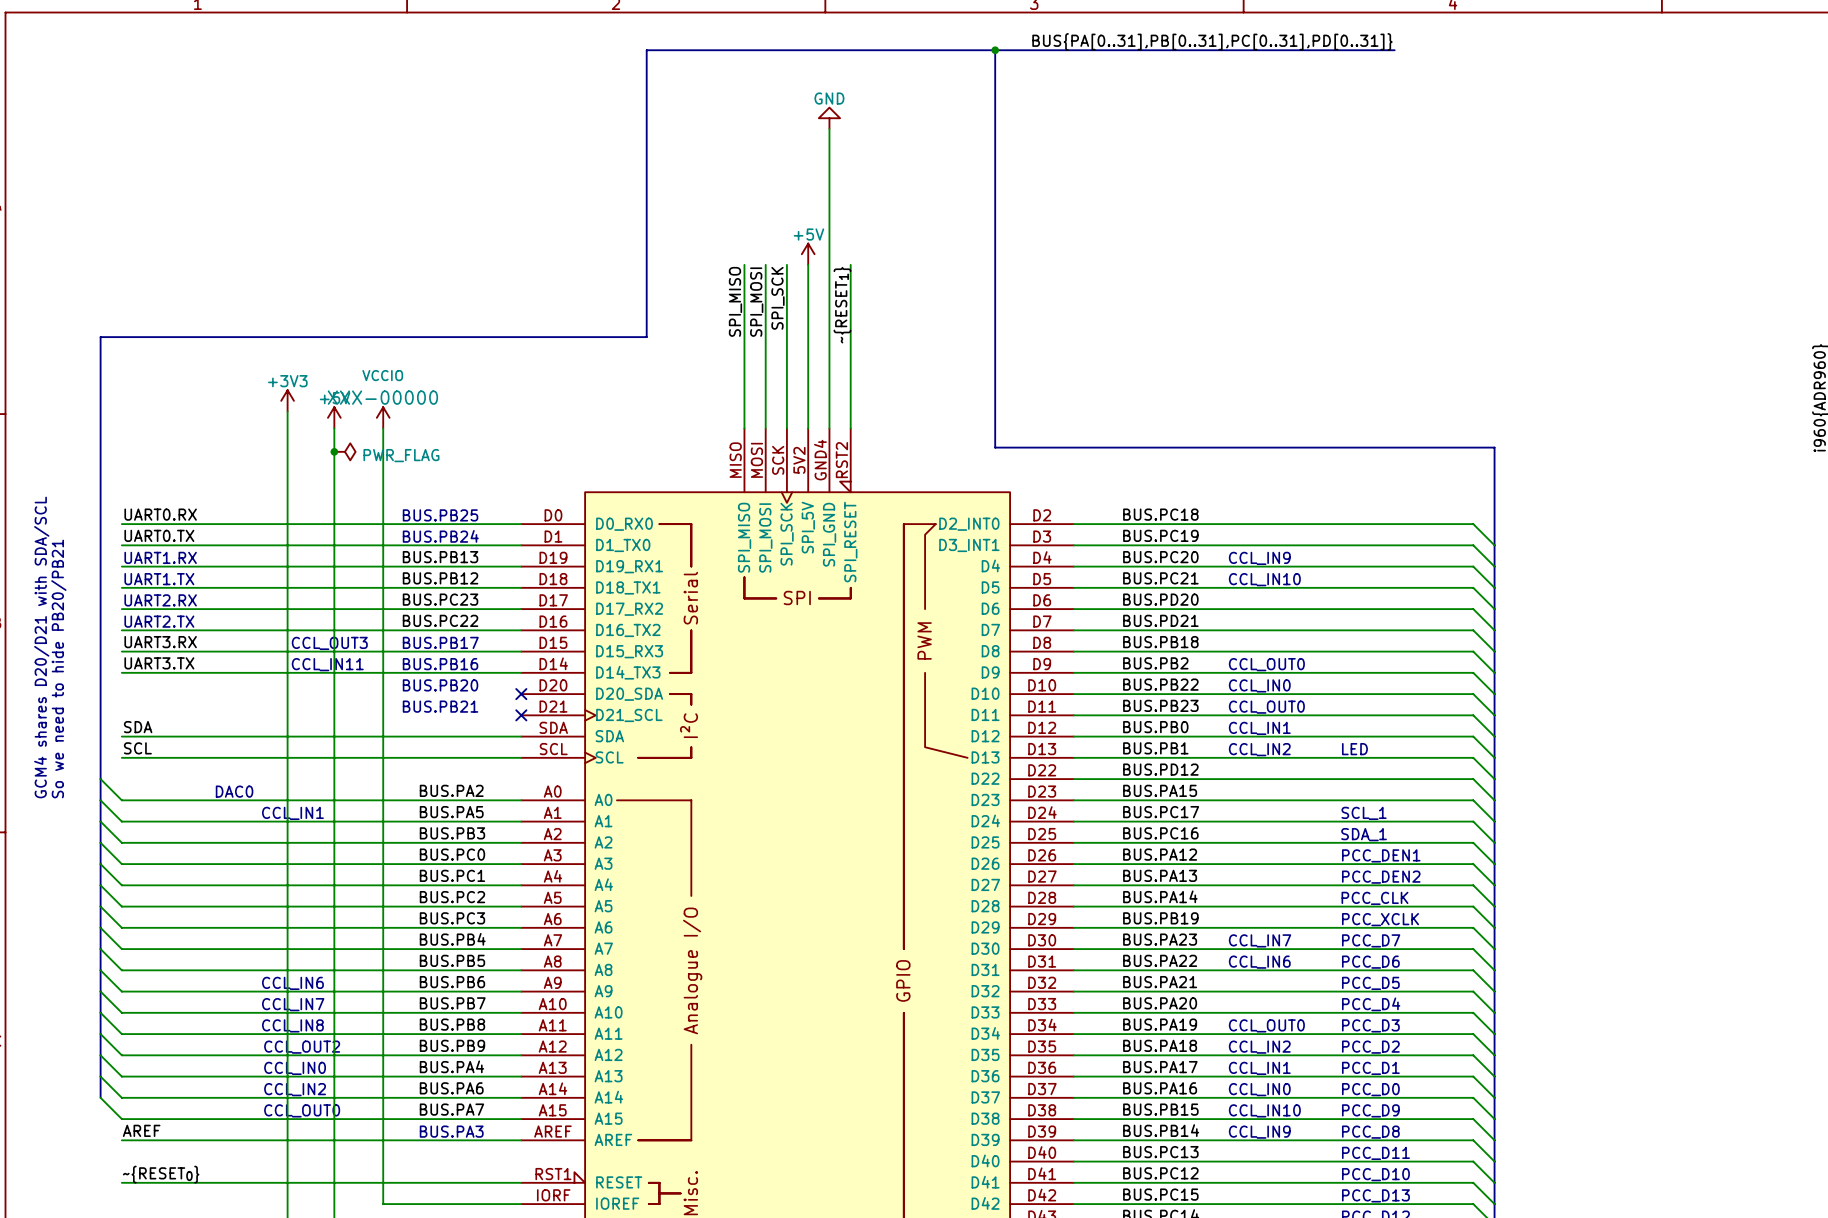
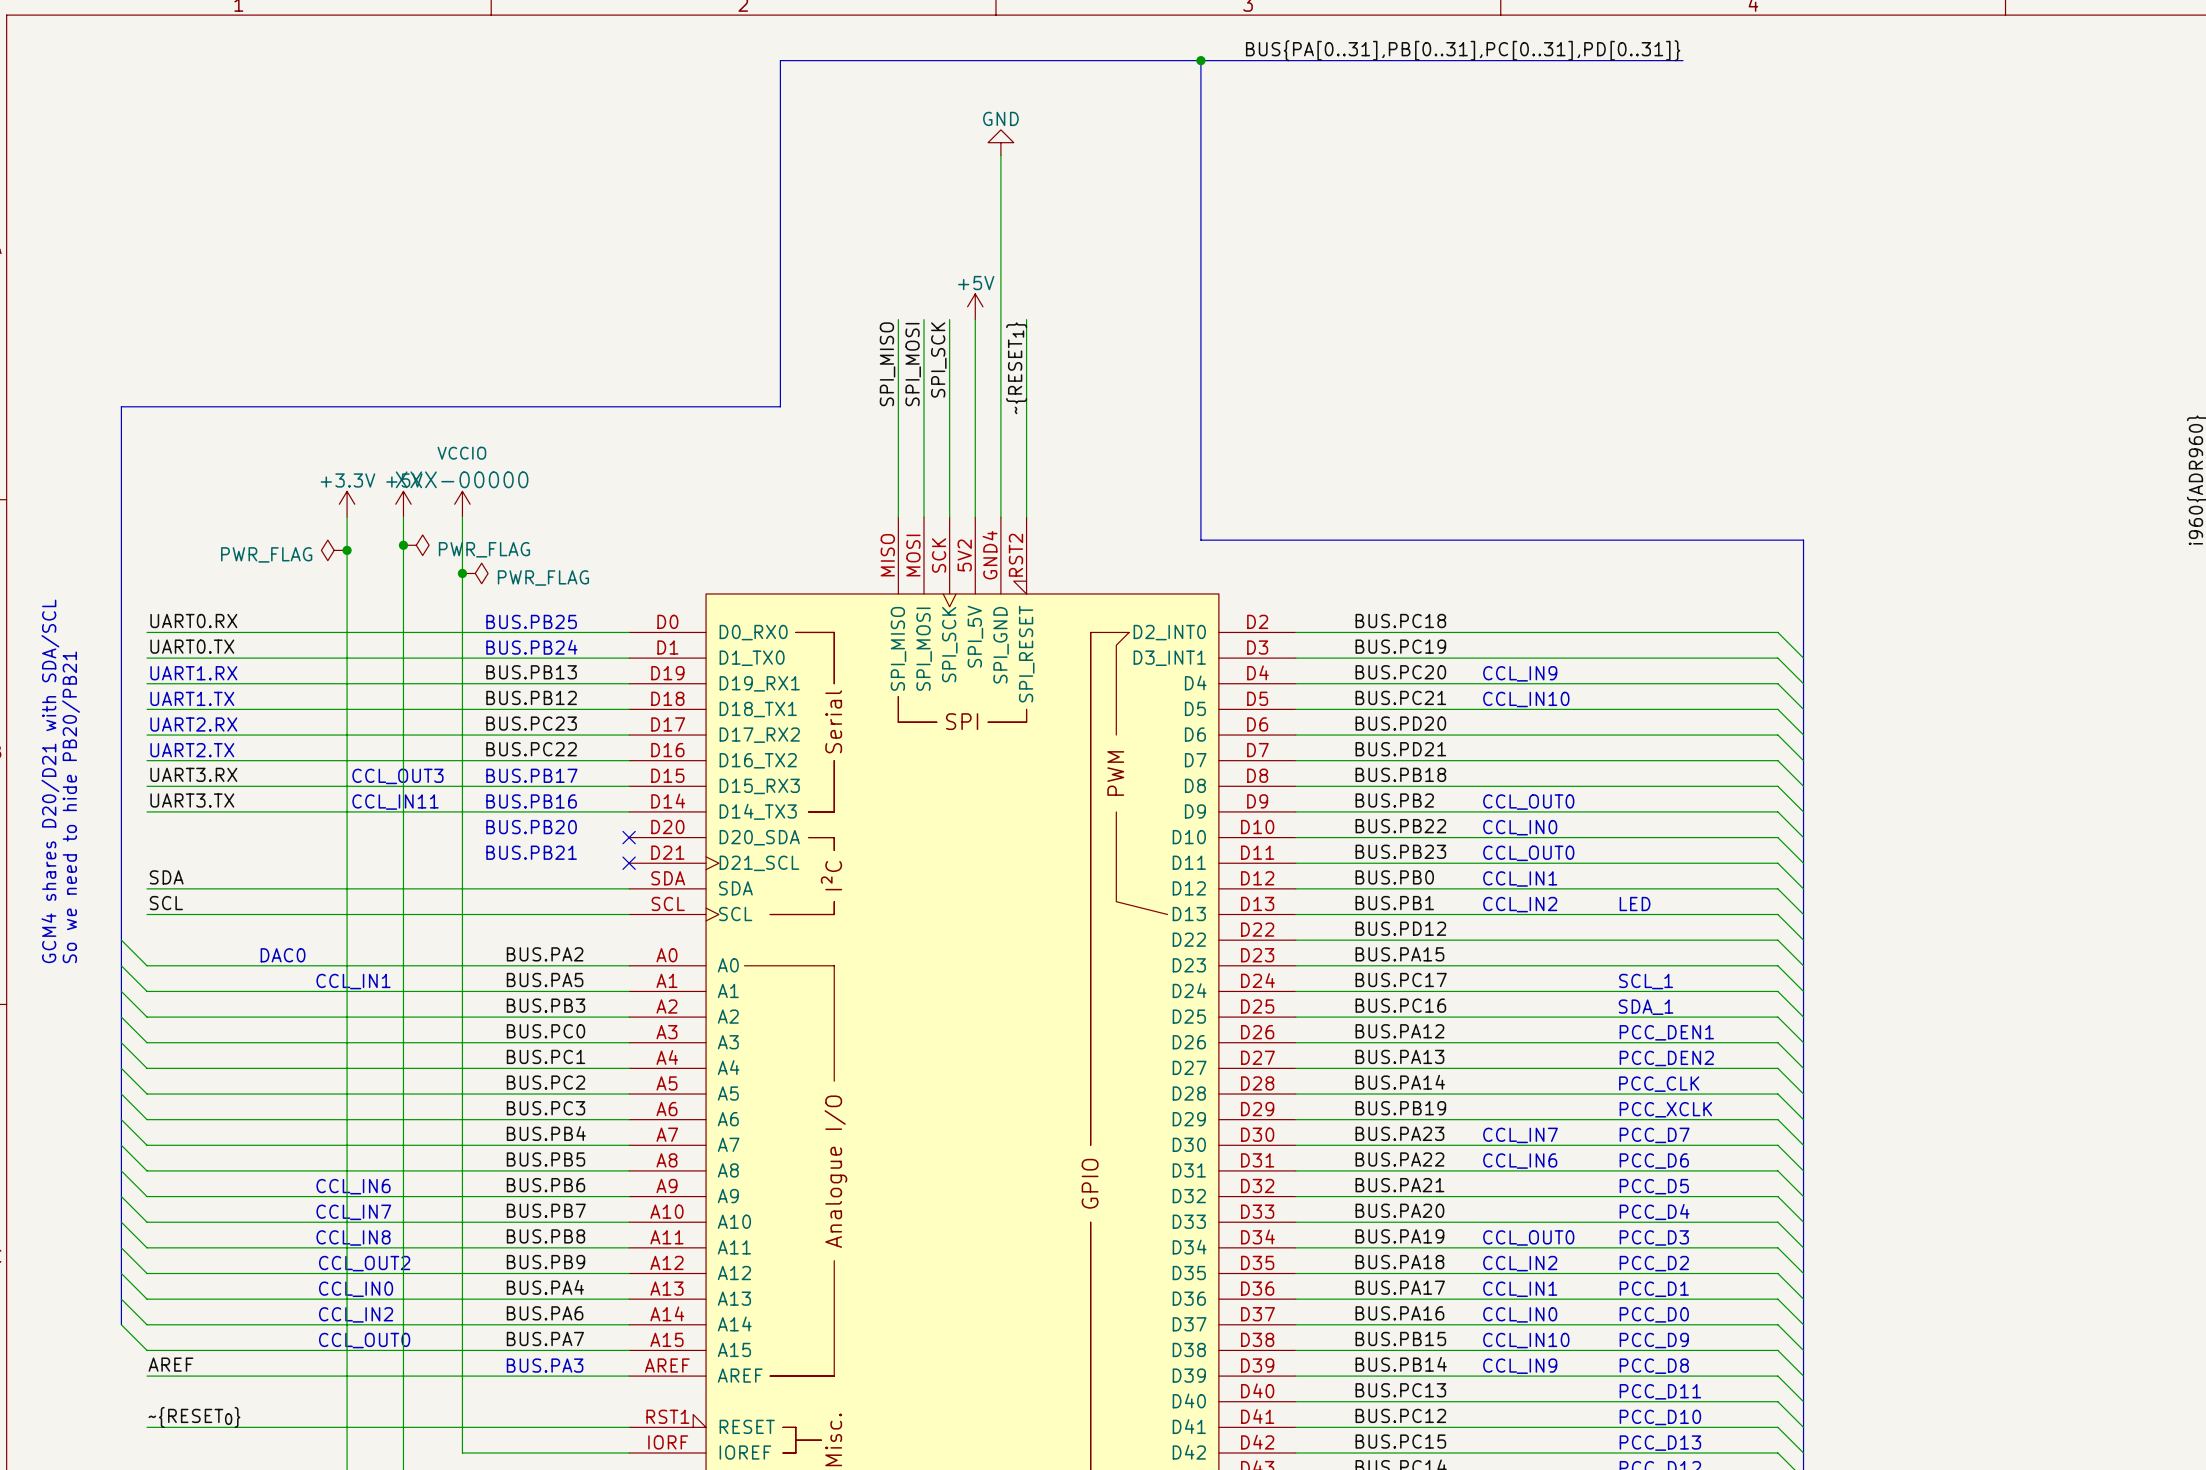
power symbol: +3V3 (287, 400) -> none
power symbol: none -> +3.3V (347, 504)
power symbol: none -> PWR_FLAG (334, 550)
junction: none -> (347, 550)
junction: none -> (462, 573)
power symbol: none -> PWR_FLAG (475, 573)

